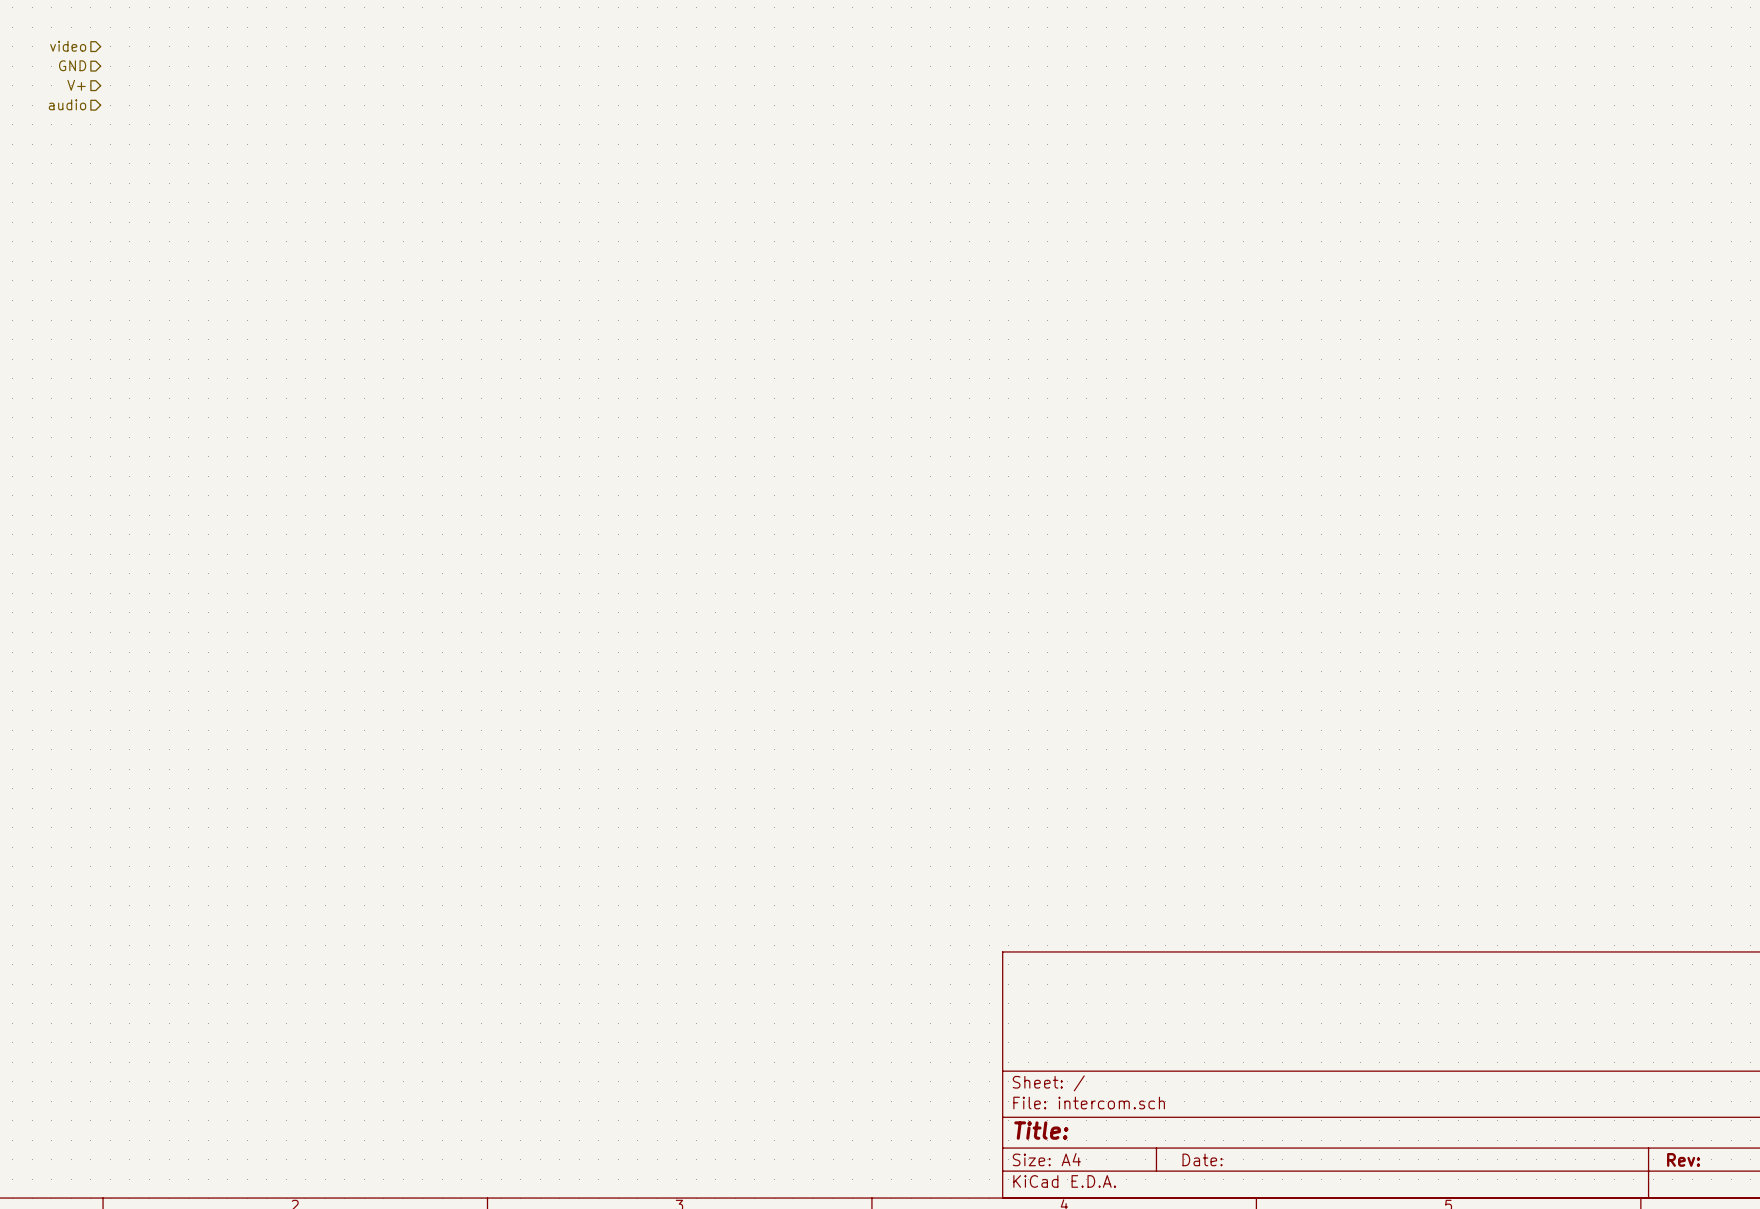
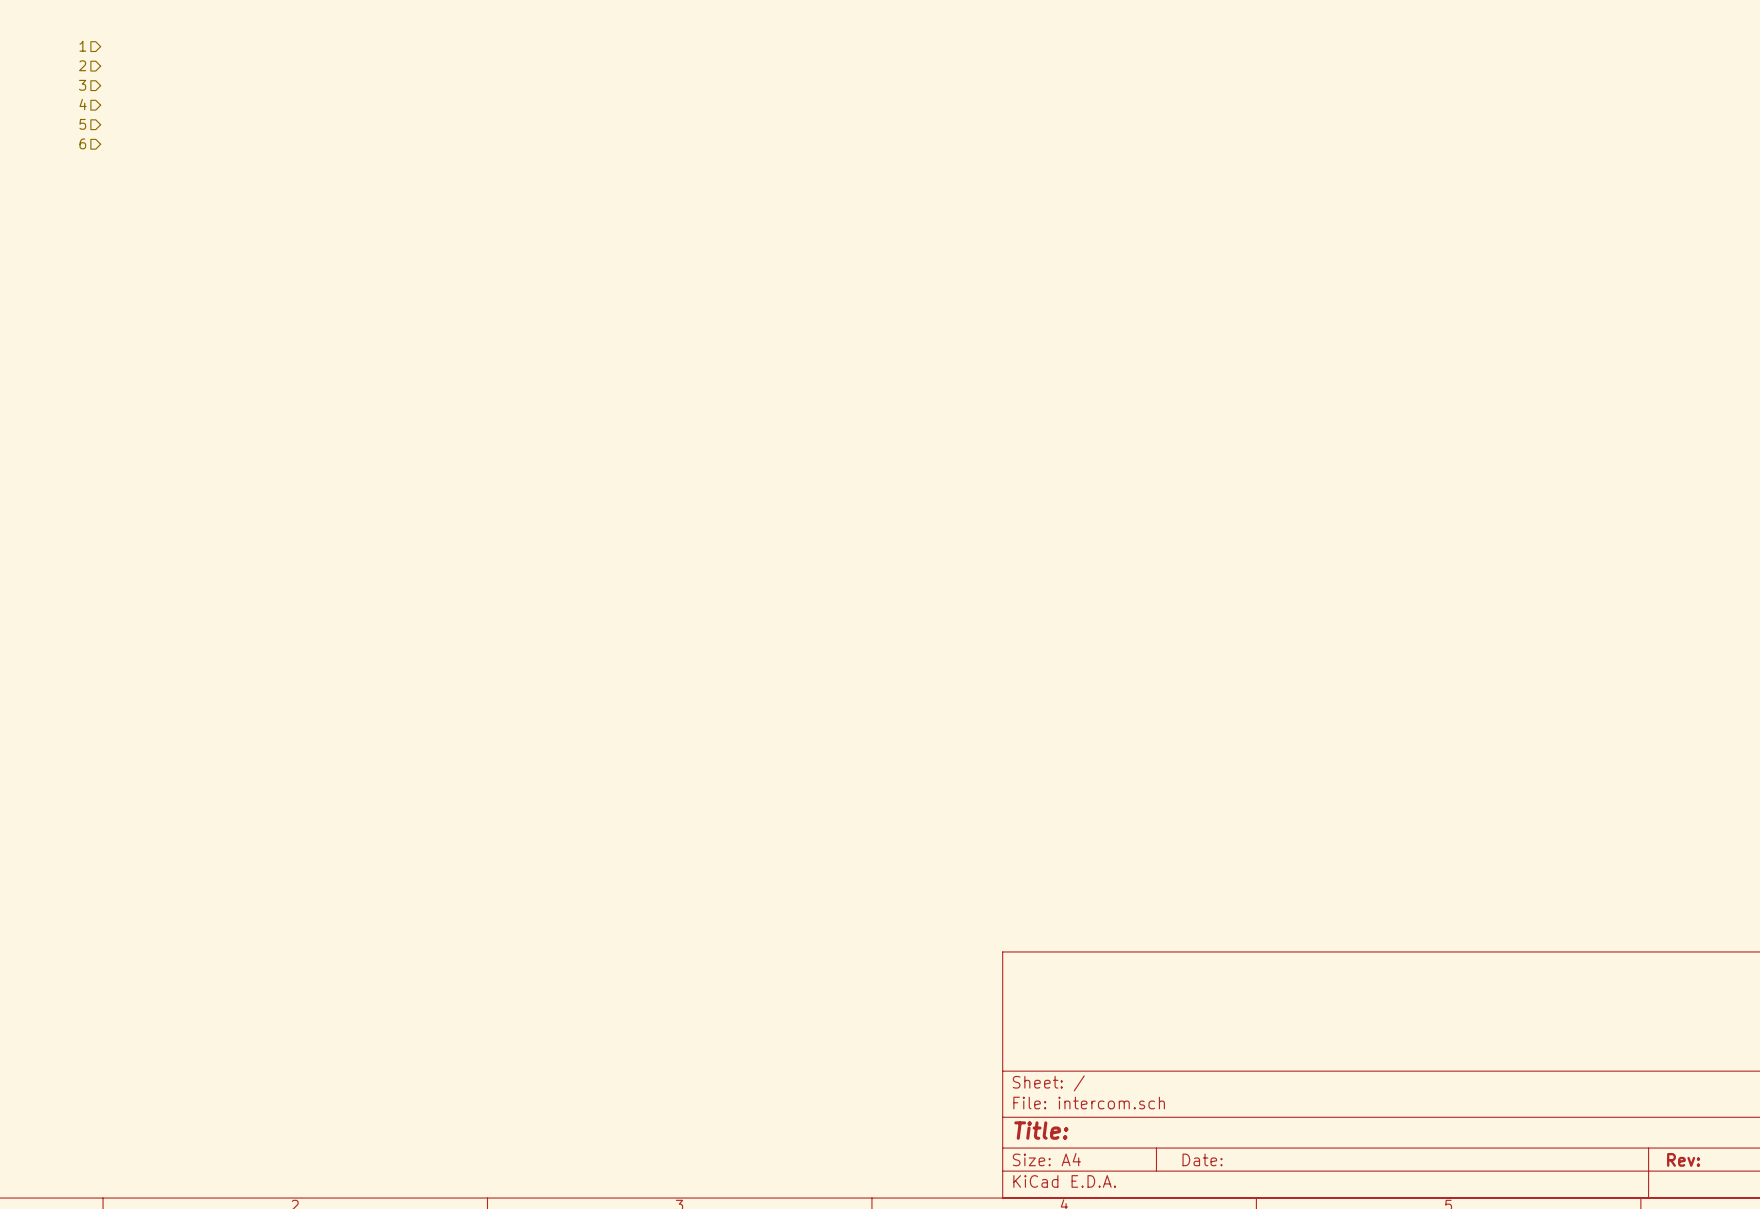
hierarchical label: video (68, 46) -> 1 (82, 46)
hierarchical label: GND (72, 65) -> 2 (82, 65)
hierarchical label: V+ (76, 85) -> 3 (82, 85)
hierarchical label: audio (67, 104) -> 4 (83, 104)
hierarchical label: none -> 5 (82, 124)
hierarchical label: none -> 6 (82, 143)

